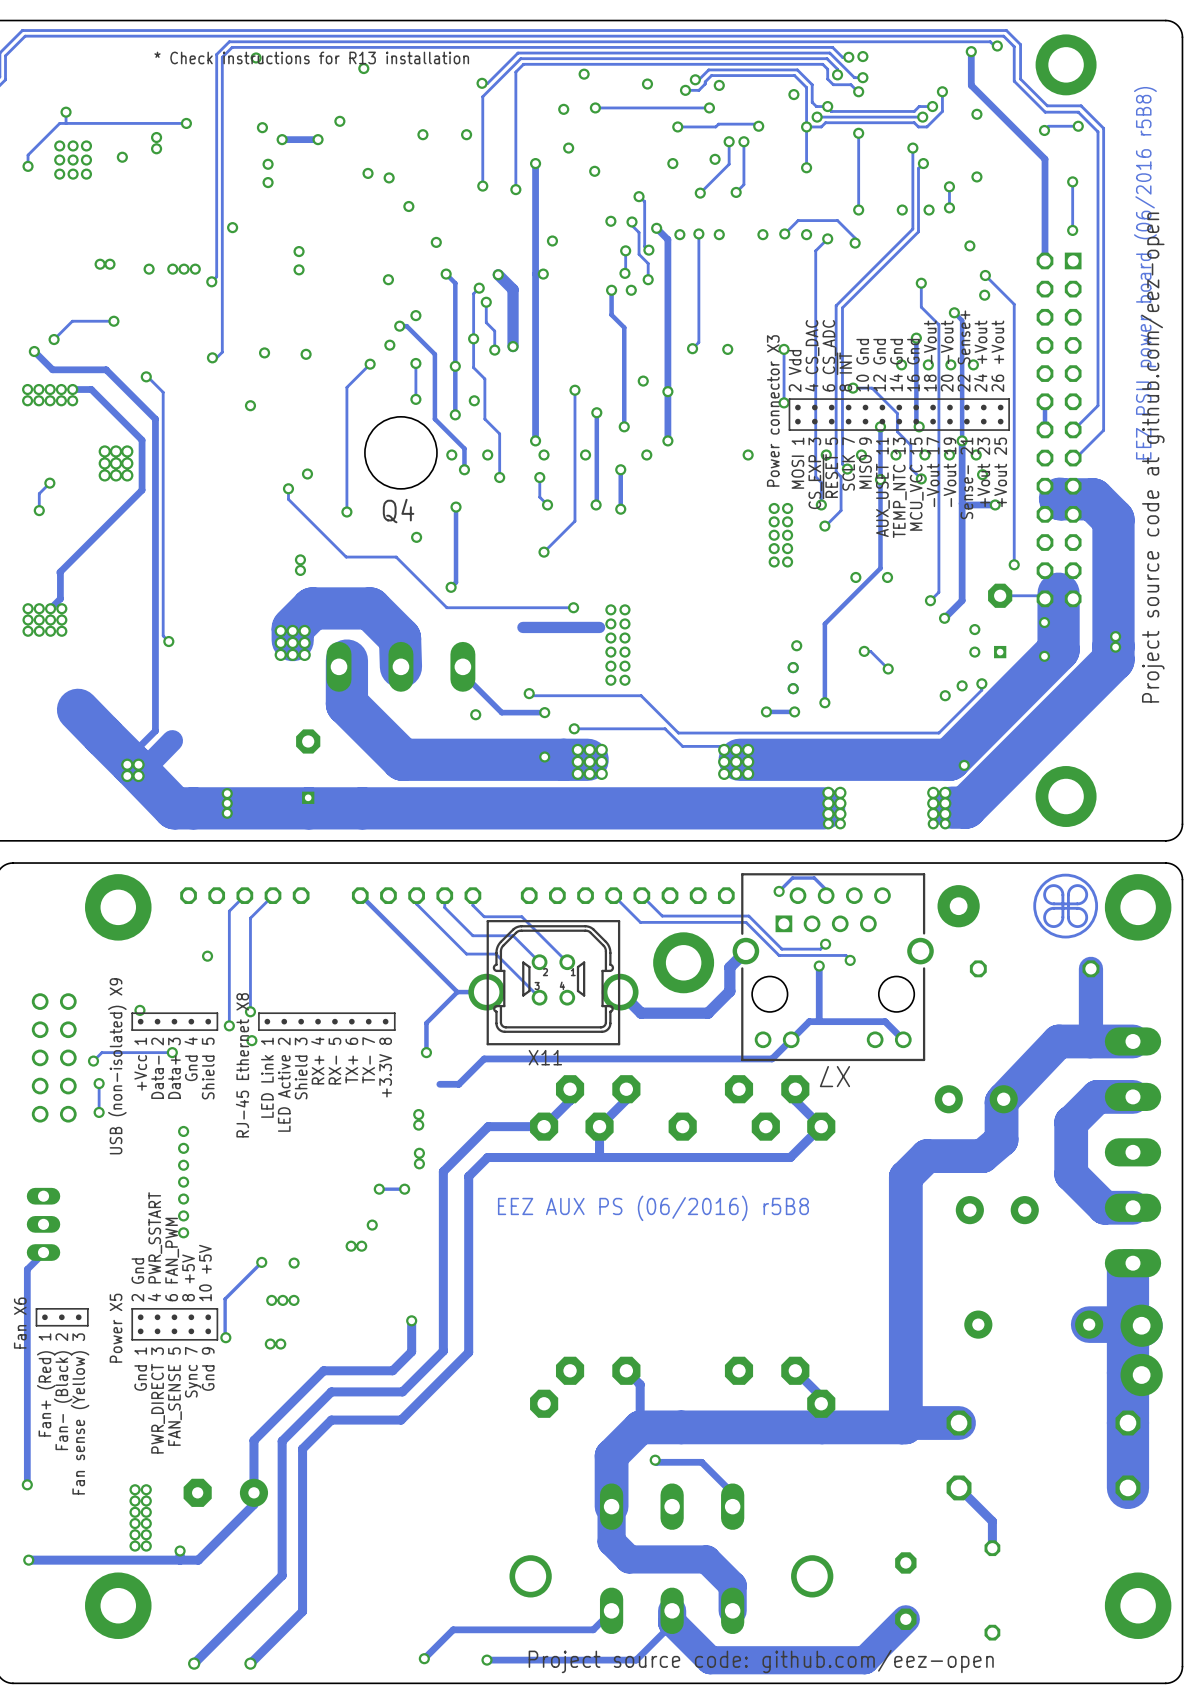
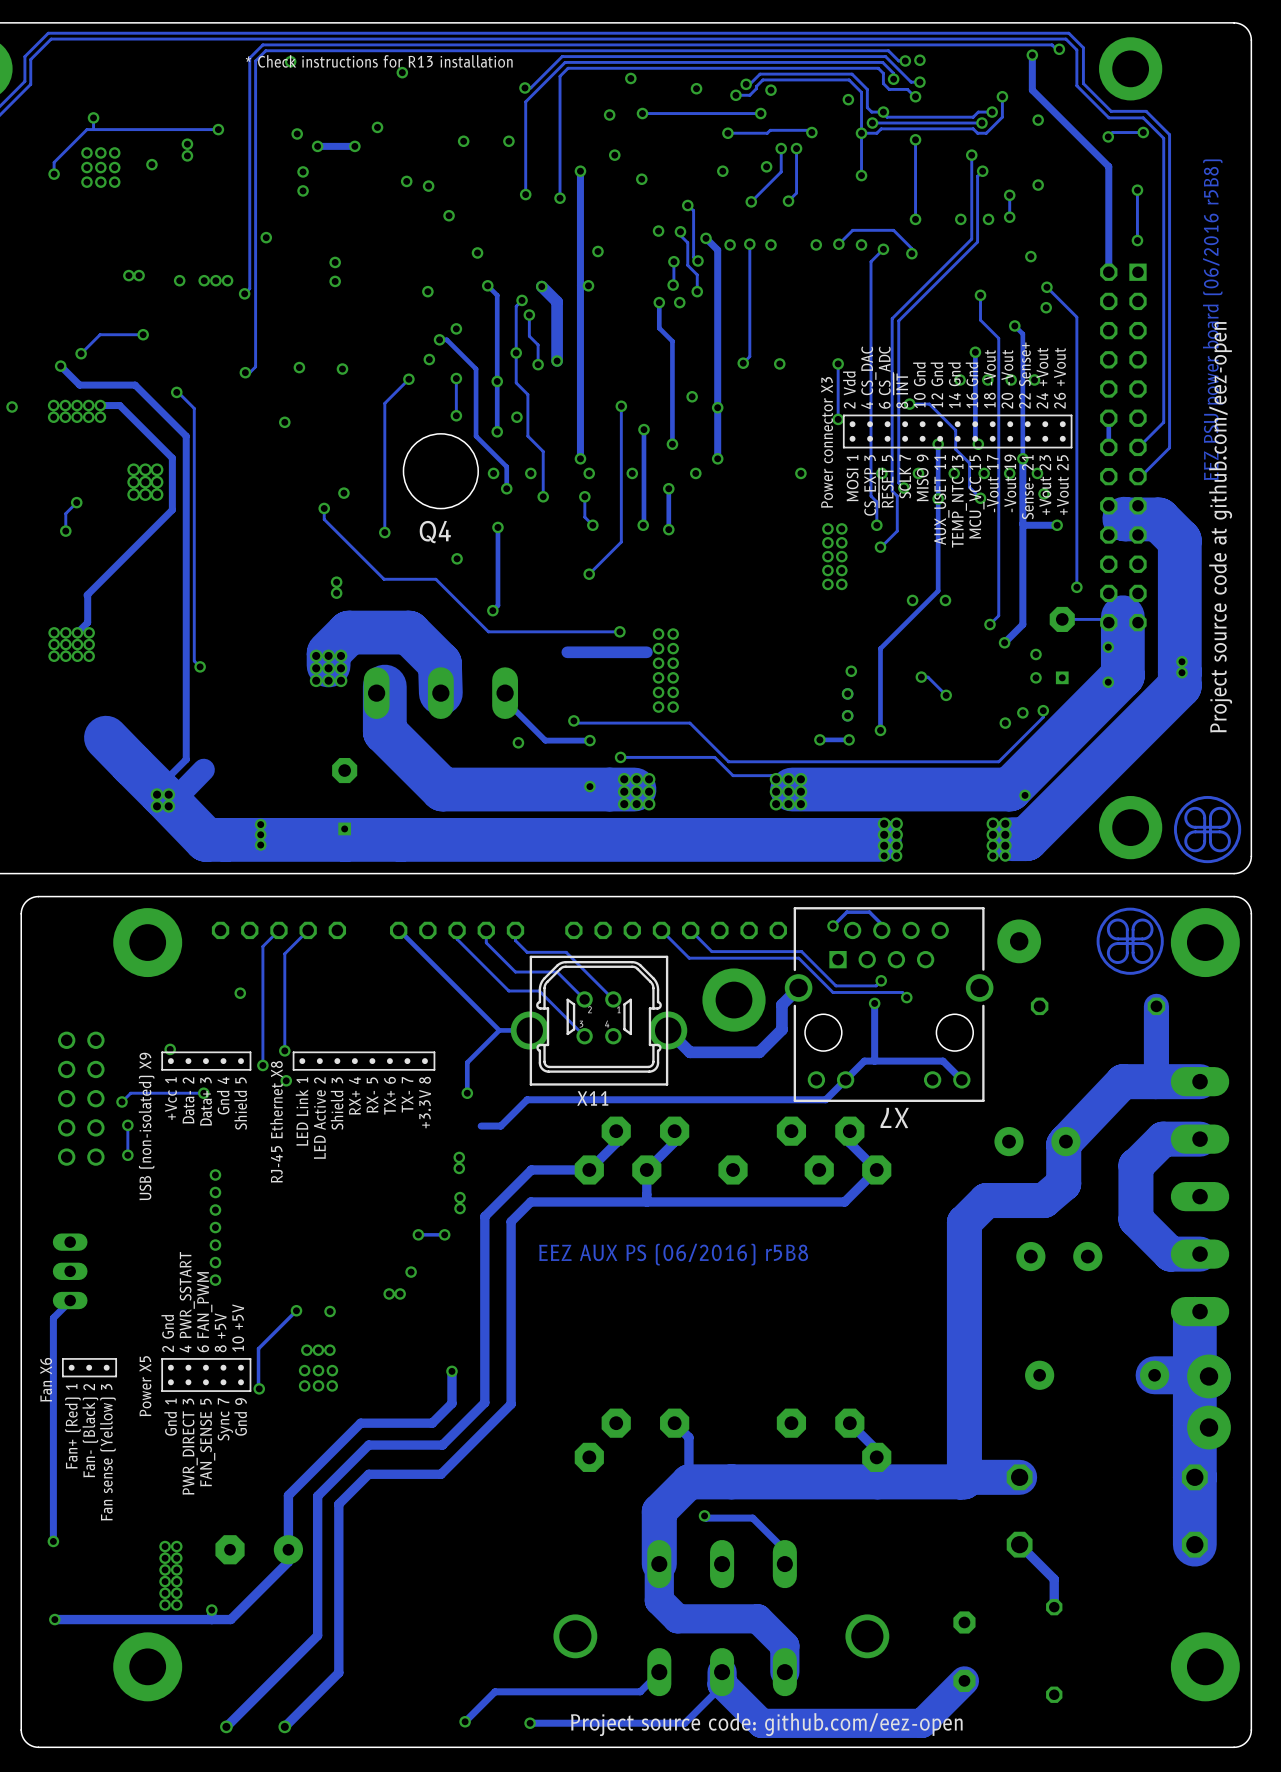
drawing: none -> [1173, 795, 1242, 864]
via: none -> (304, 1370)
via: none -> (318, 1370)
via: none -> (332, 1370)
via: none -> (304, 1385)
via: none -> (318, 1385)
via: none -> (332, 1385)
via: (270, 1344) -> none
via: (280, 1344) -> none

